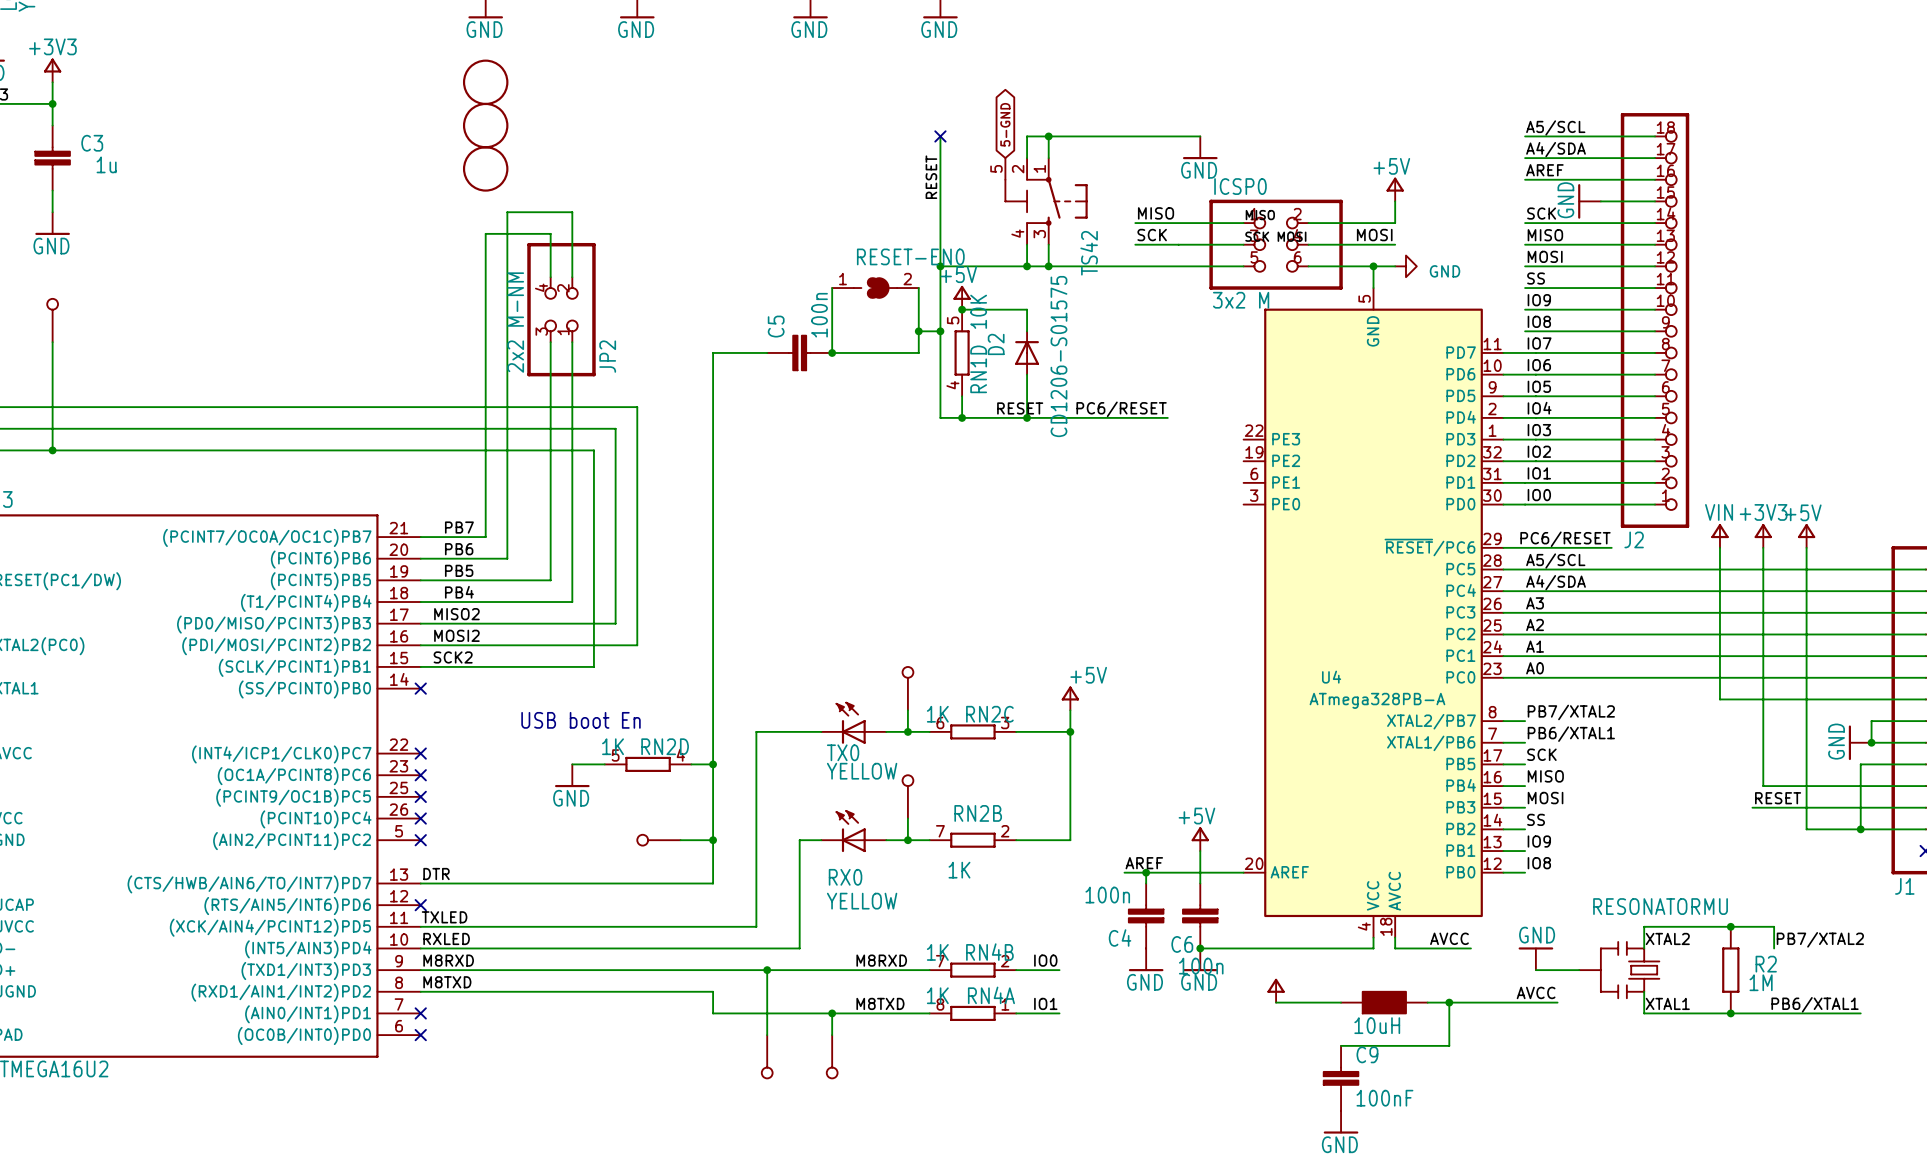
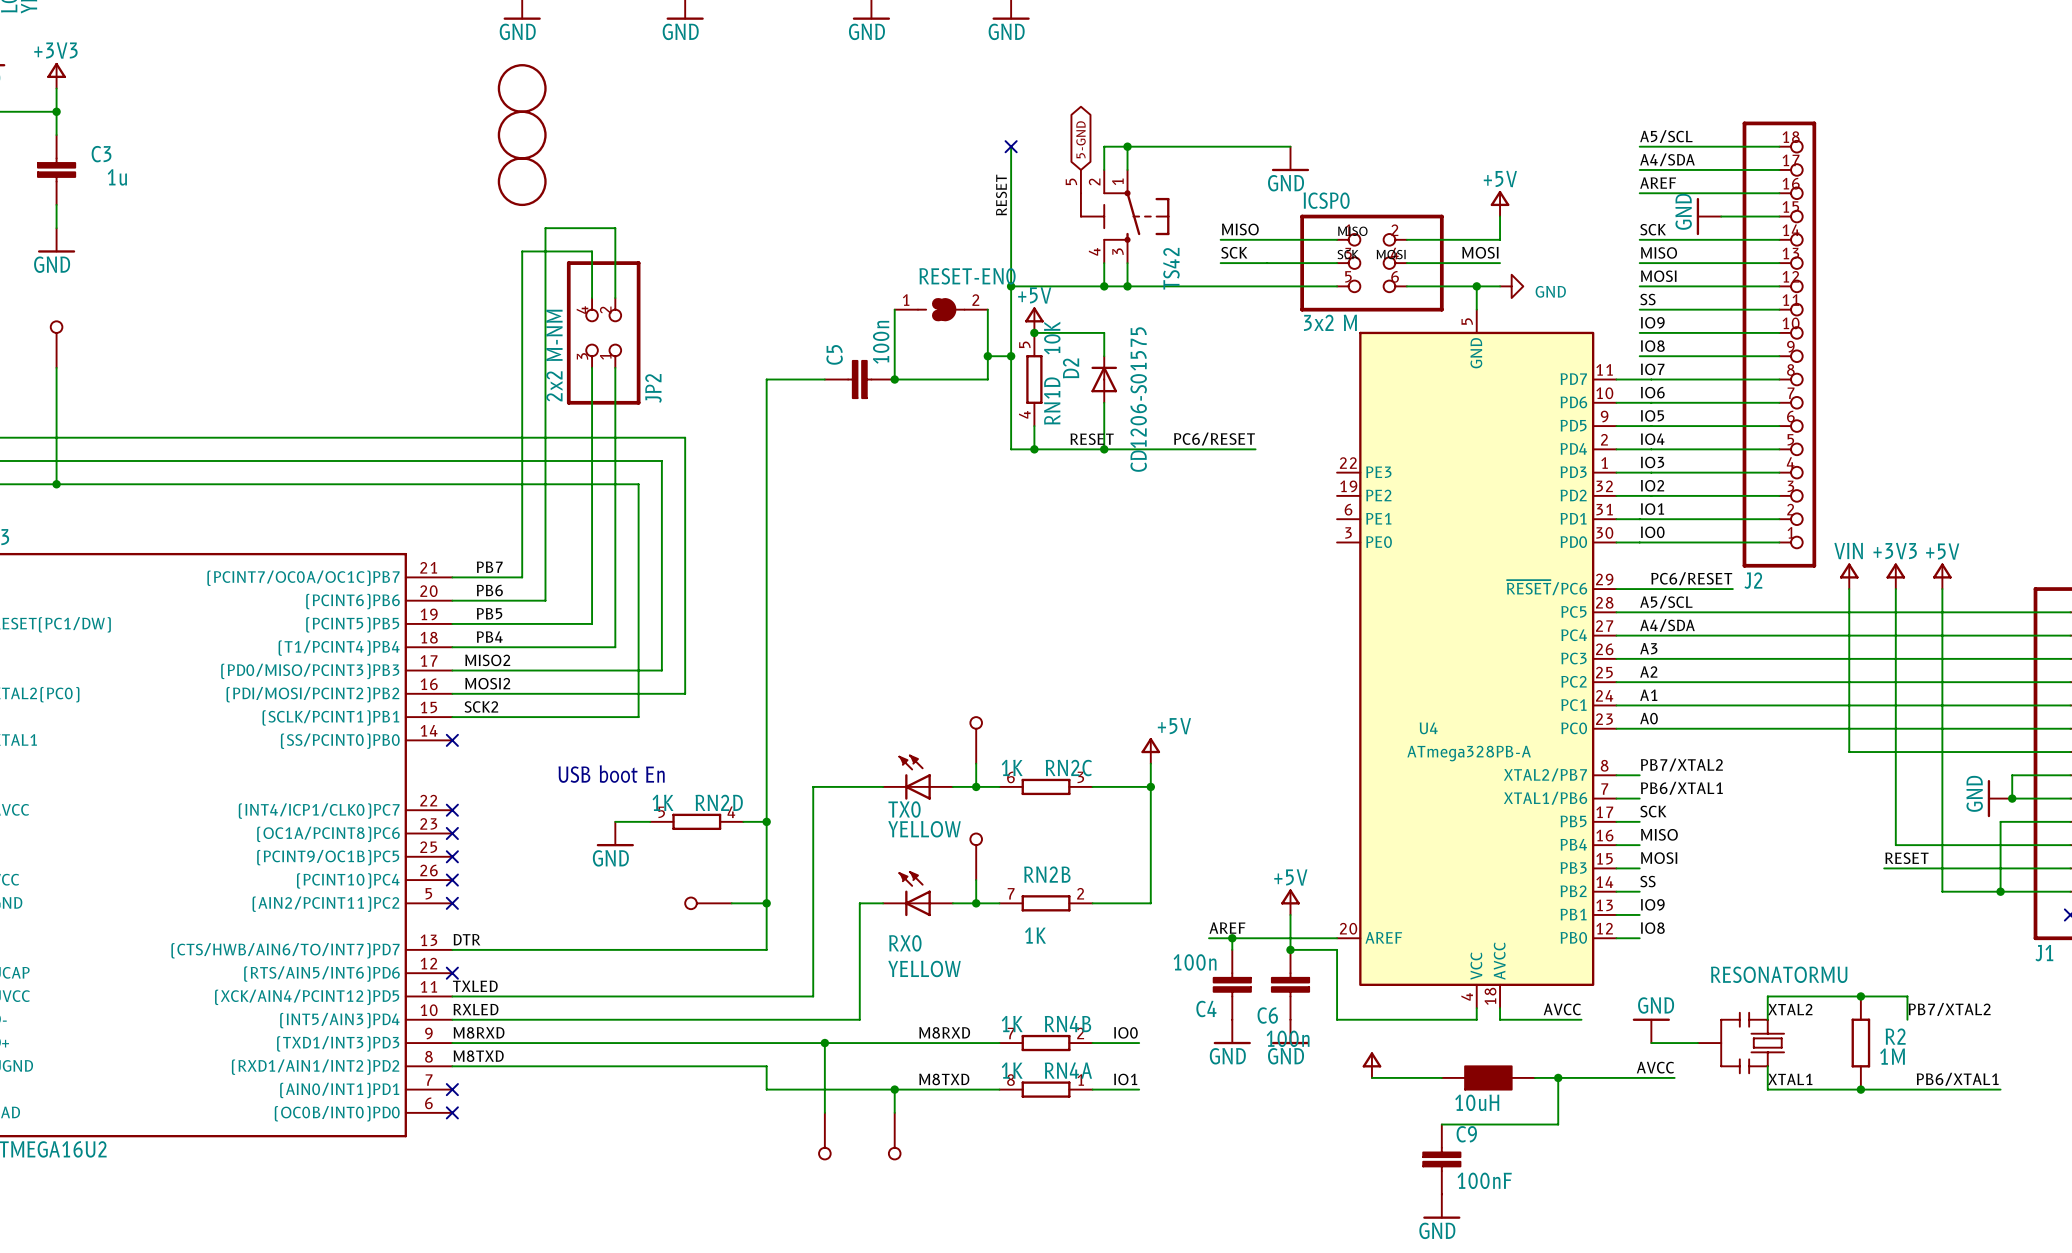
junction: none -> (1290, 949)
wire: (1200, 948) (1243, 948) -> (1290, 949) (1337, 949) (1337, 1019)
junction: (1200, 948) -> none

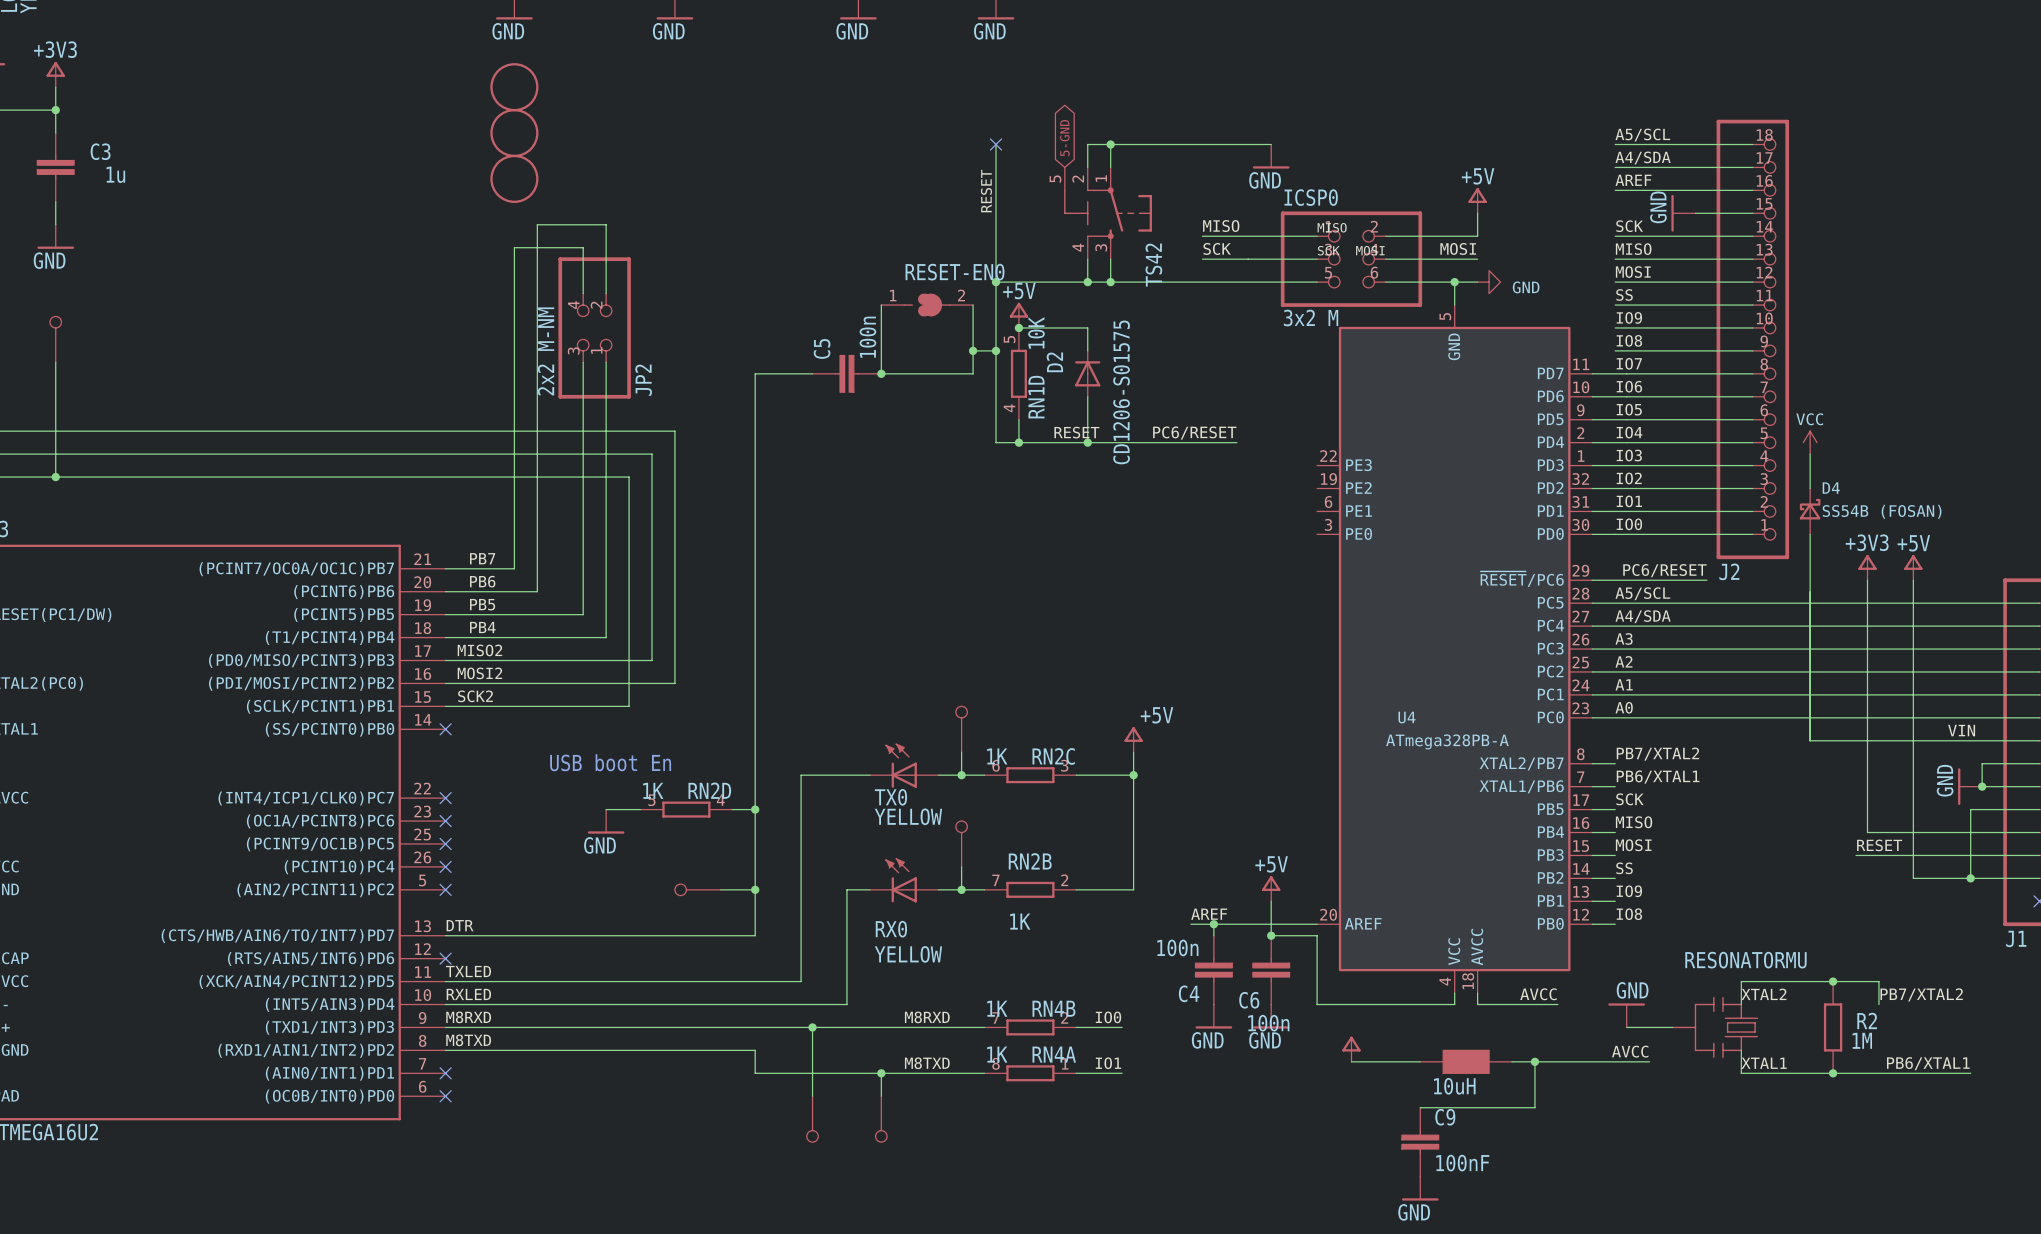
power symbol: none -> VCC (1810, 442)
wire: none -> (1810, 454) (1810, 488)
D4: none -> SS54B (FOSAN) (1810, 511)
power symbol: VIN (1849, 576) -> none
wire: (1849, 589) (1849, 752) -> (1810, 534) (1810, 740) (1821, 740)
label: none -> VIN (1961, 730)

